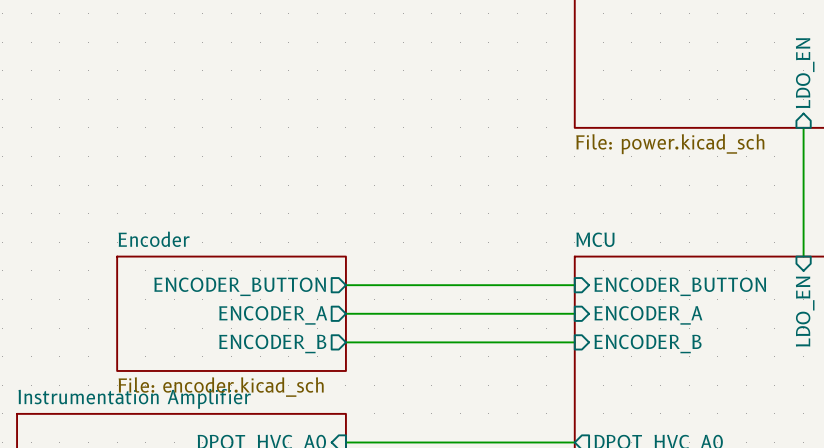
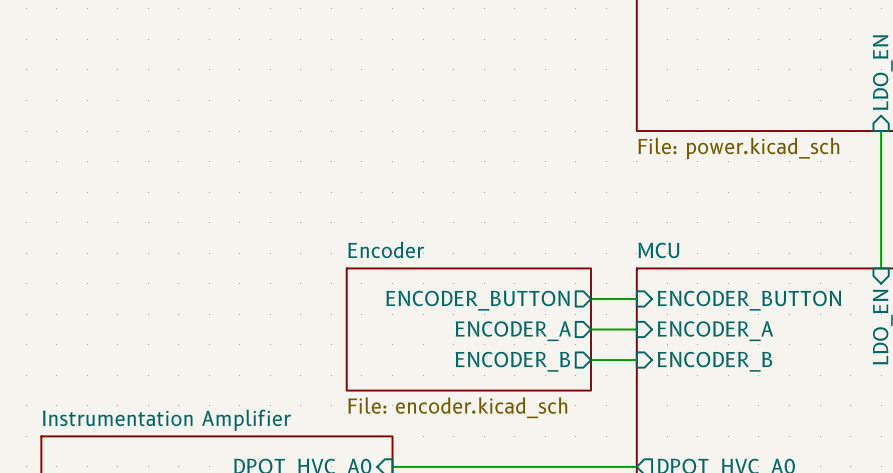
wire: (345, 285) (531, 285) -> none
sheet pin position: ENCODER_BUTTON (240, 286) -> ENCODER_BUTTON (477, 300)
sheet Encoder position: (231, 313) -> (468, 329)
wire: (345, 313) (531, 313) -> none
sheet pin position: ENCODER_A (273, 315) -> ENCODER_A (513, 331)
wire: (345, 342) (531, 342) -> none
sheet pin position: ENCODER_B (272, 343) -> ENCODER_B (512, 361)

